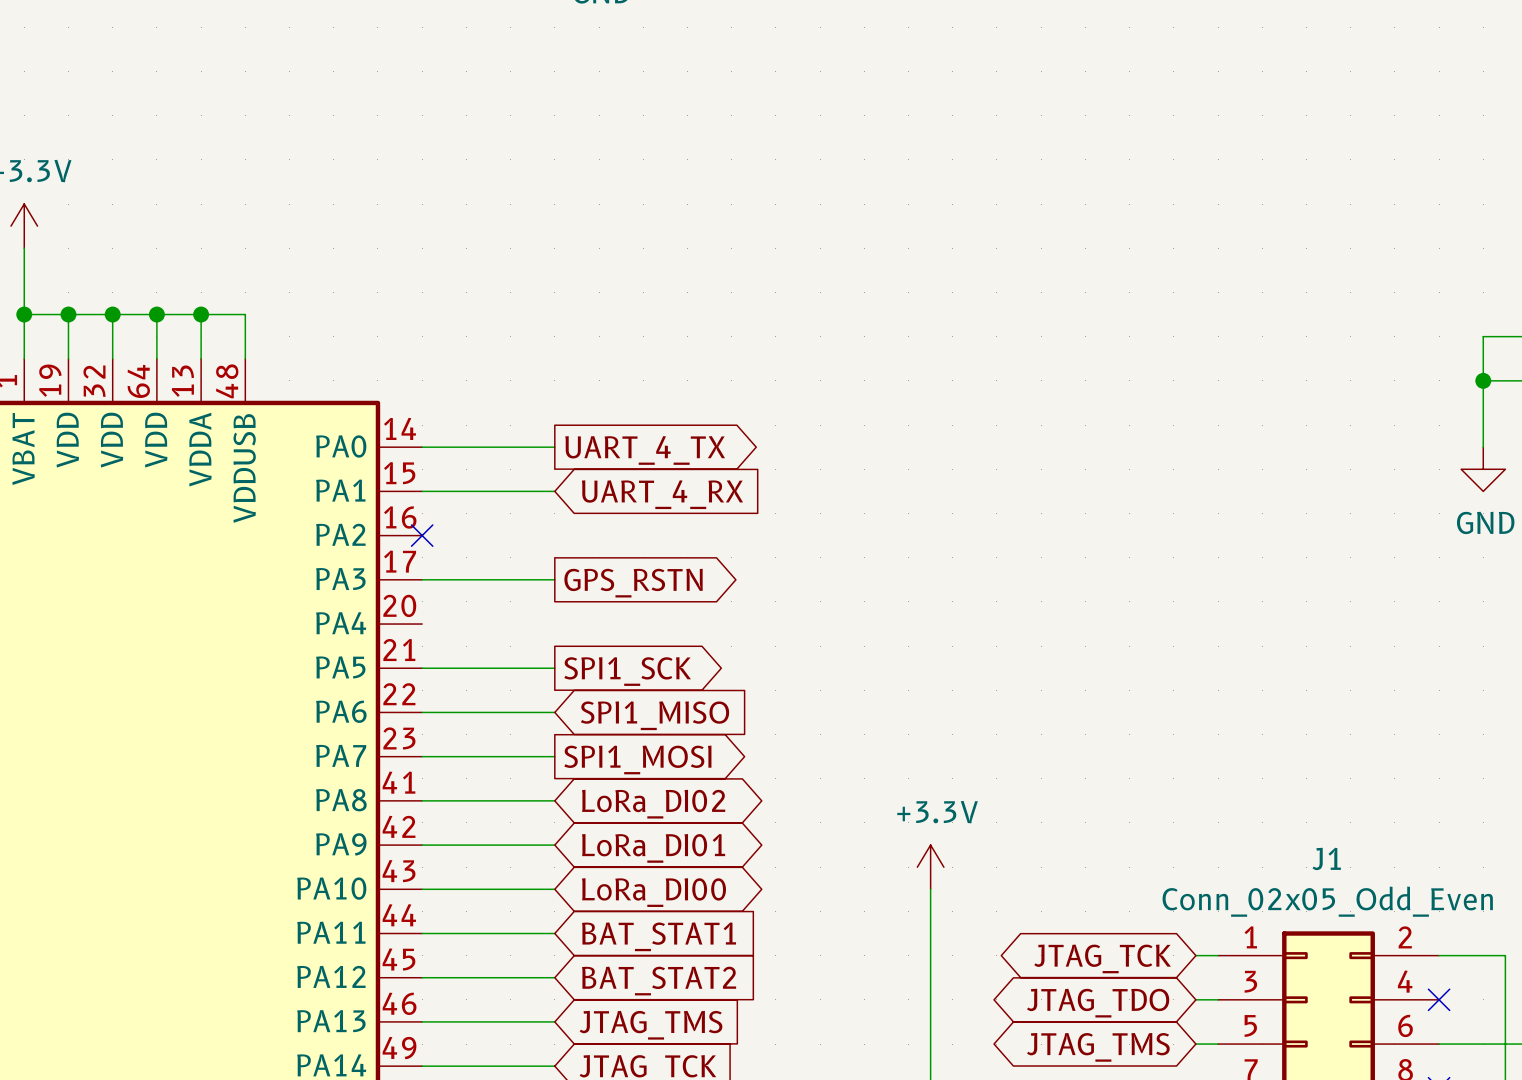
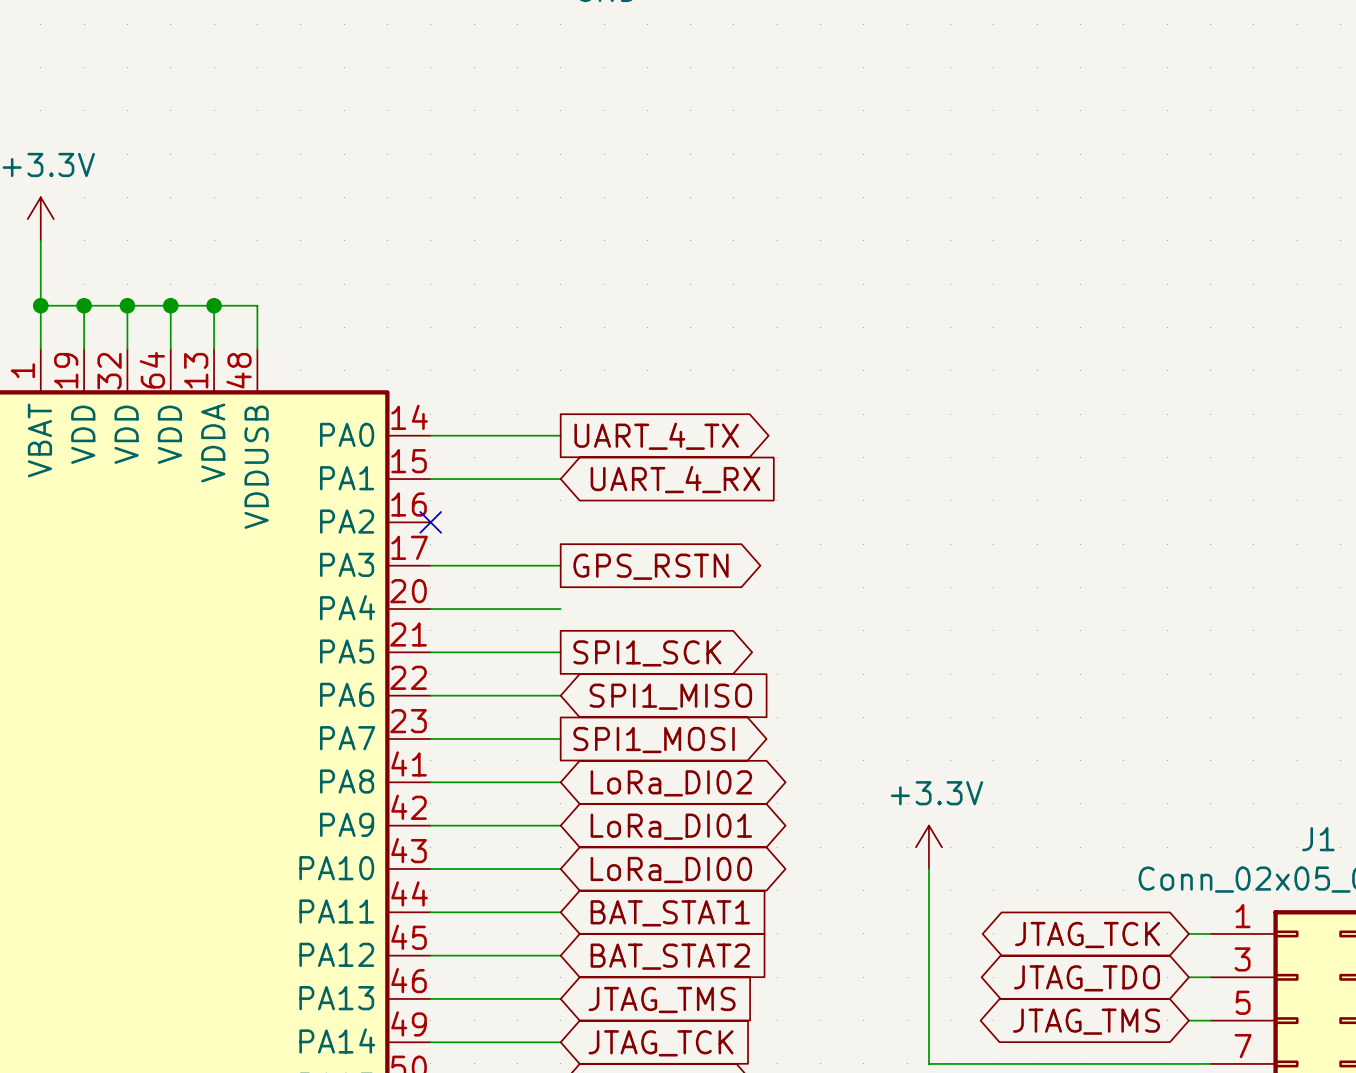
wire: none -> (430, 609) (560, 609)

